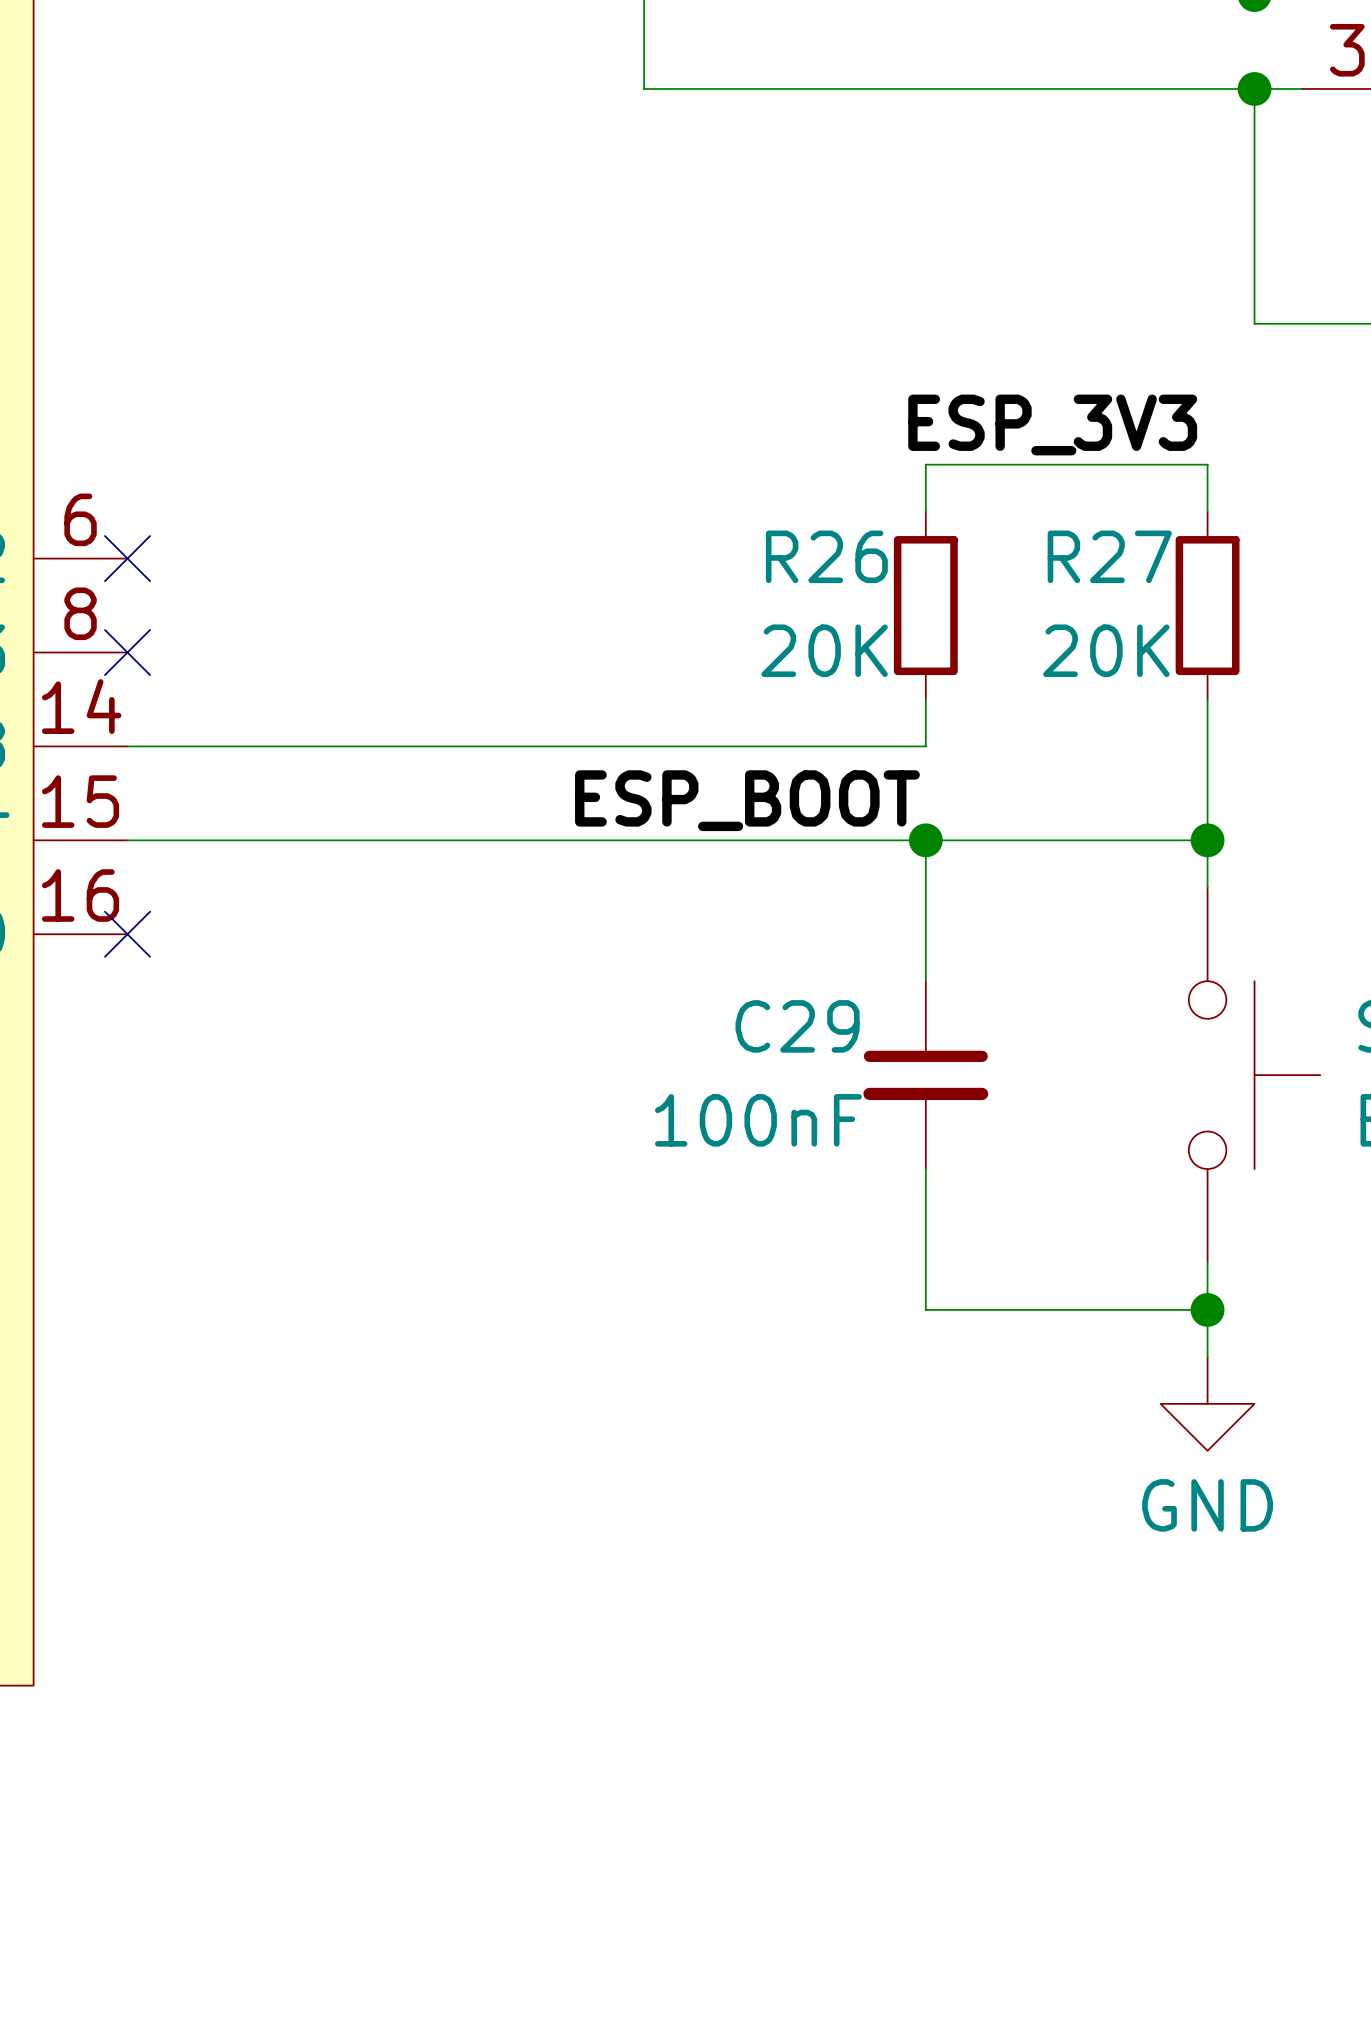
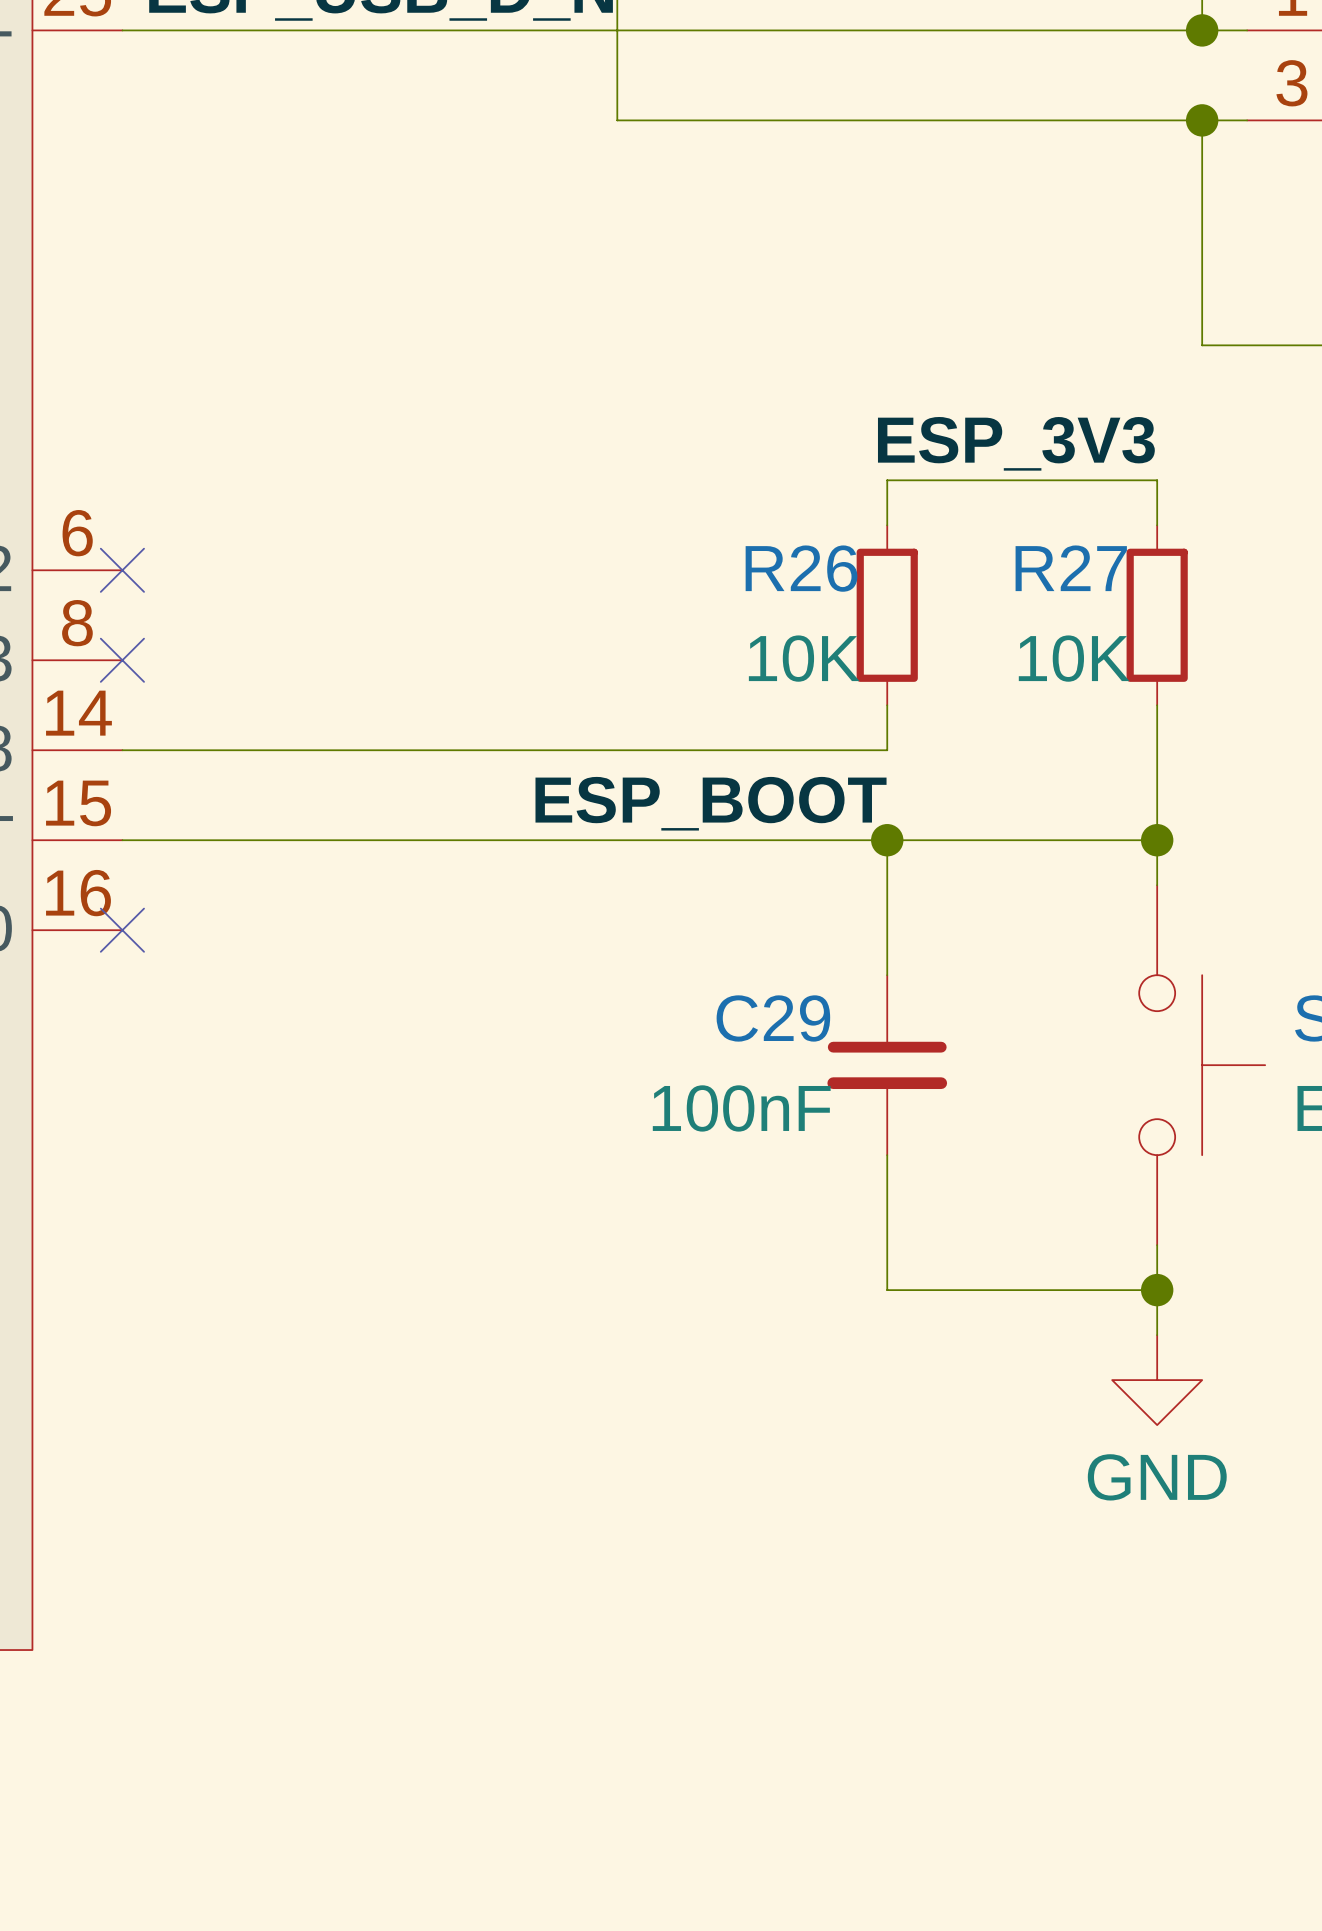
R26 value: 20K (824, 650) -> 10K (804, 658)
R27 value: 20K (1106, 650) -> 10K (1074, 658)

